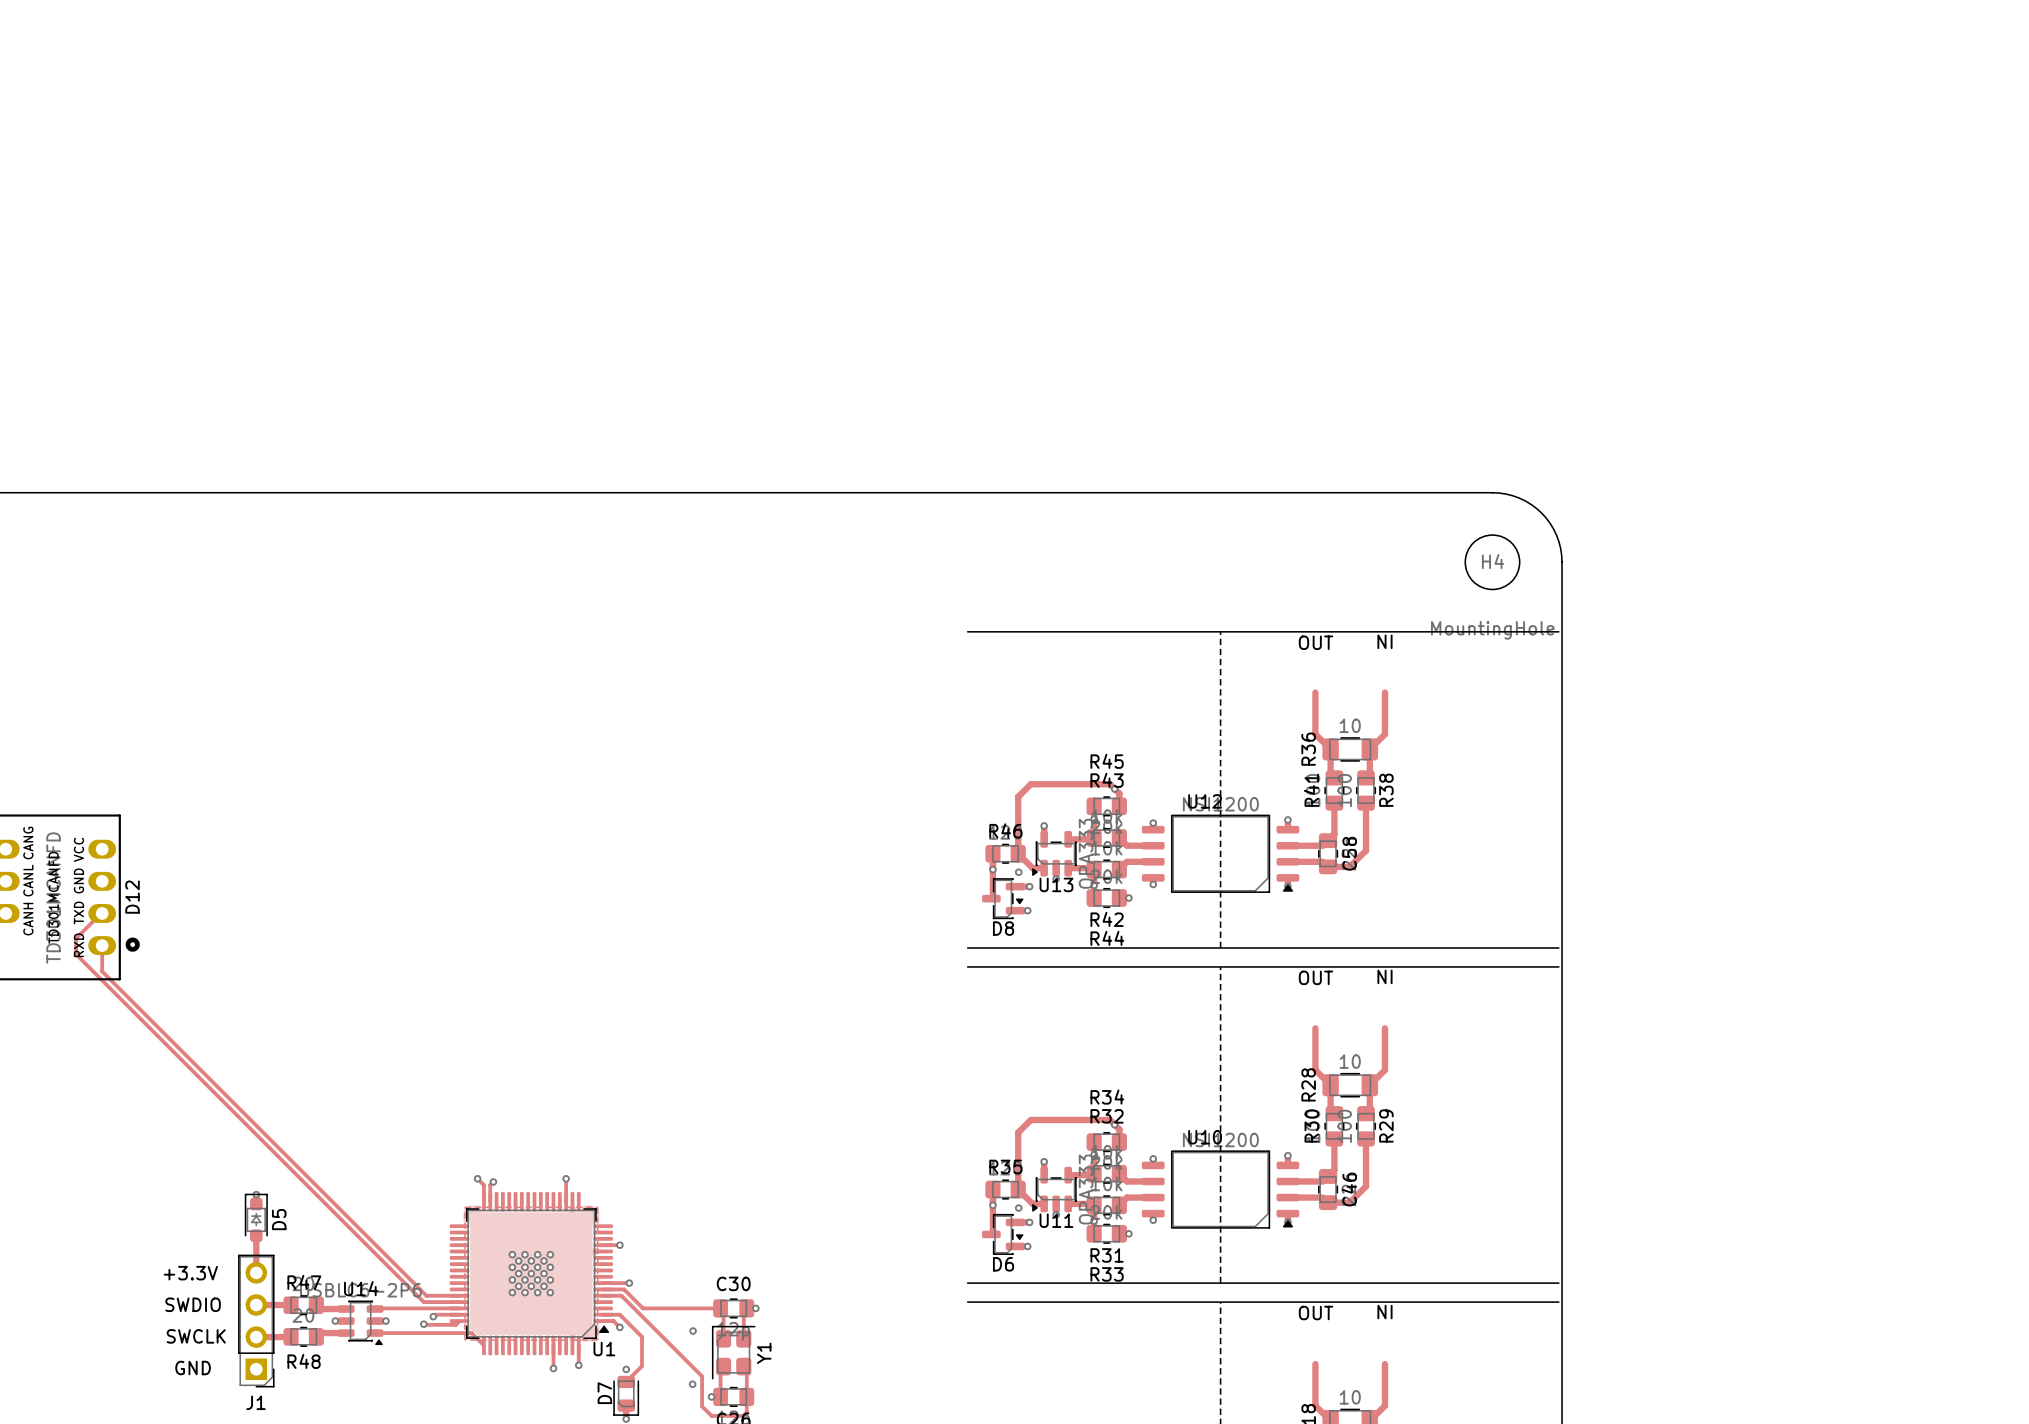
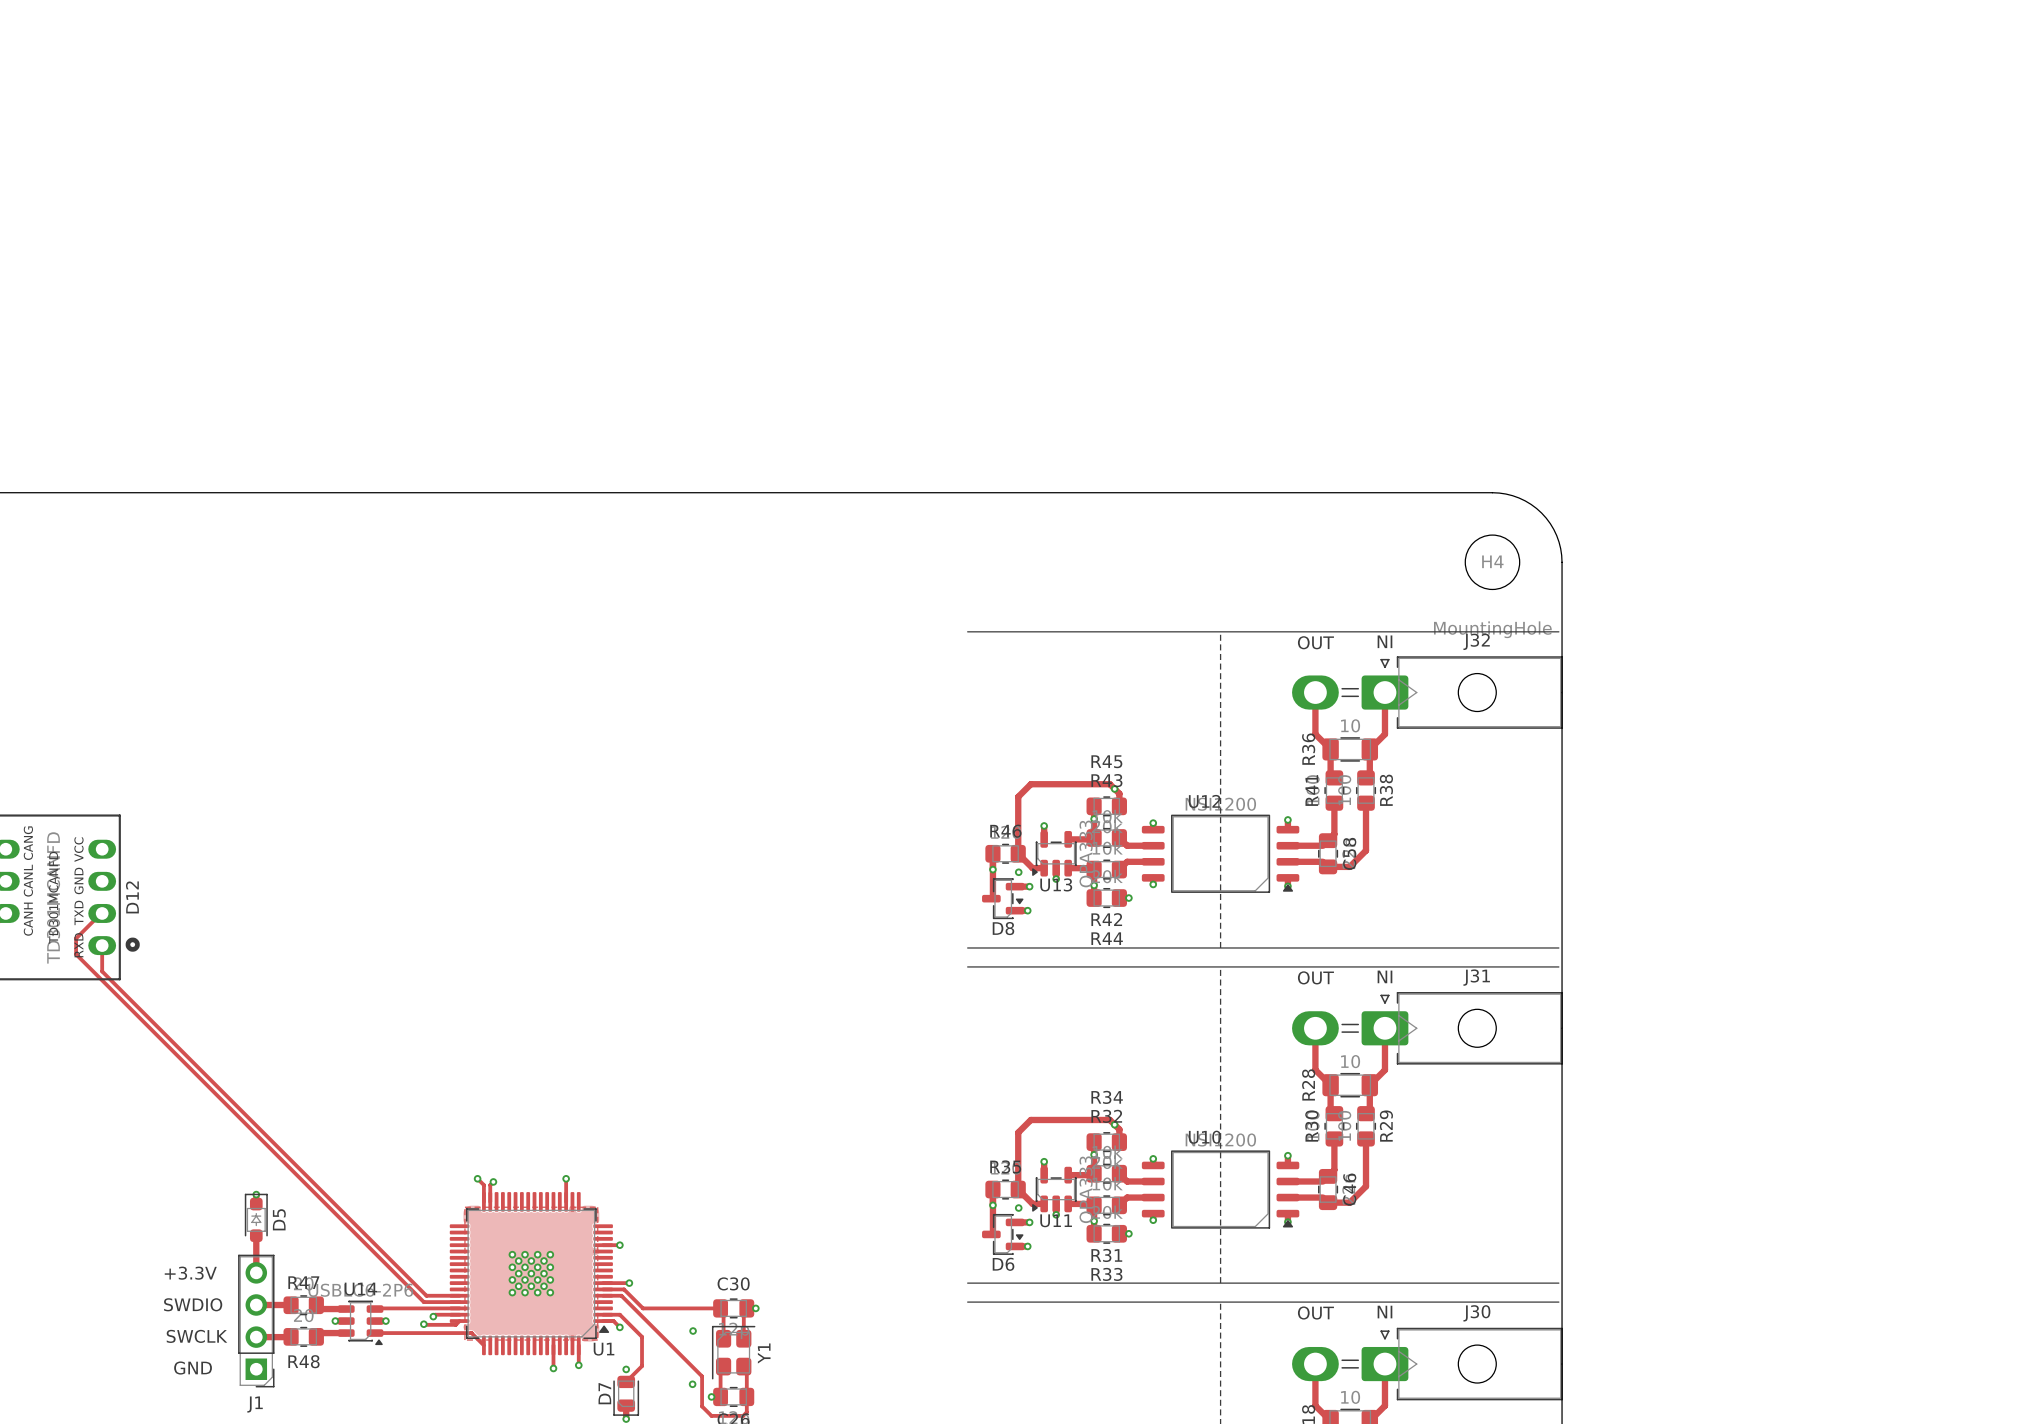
J32: none -> (1427, 692)
J31: none -> (1427, 1028)
J30: none -> (1427, 1364)

